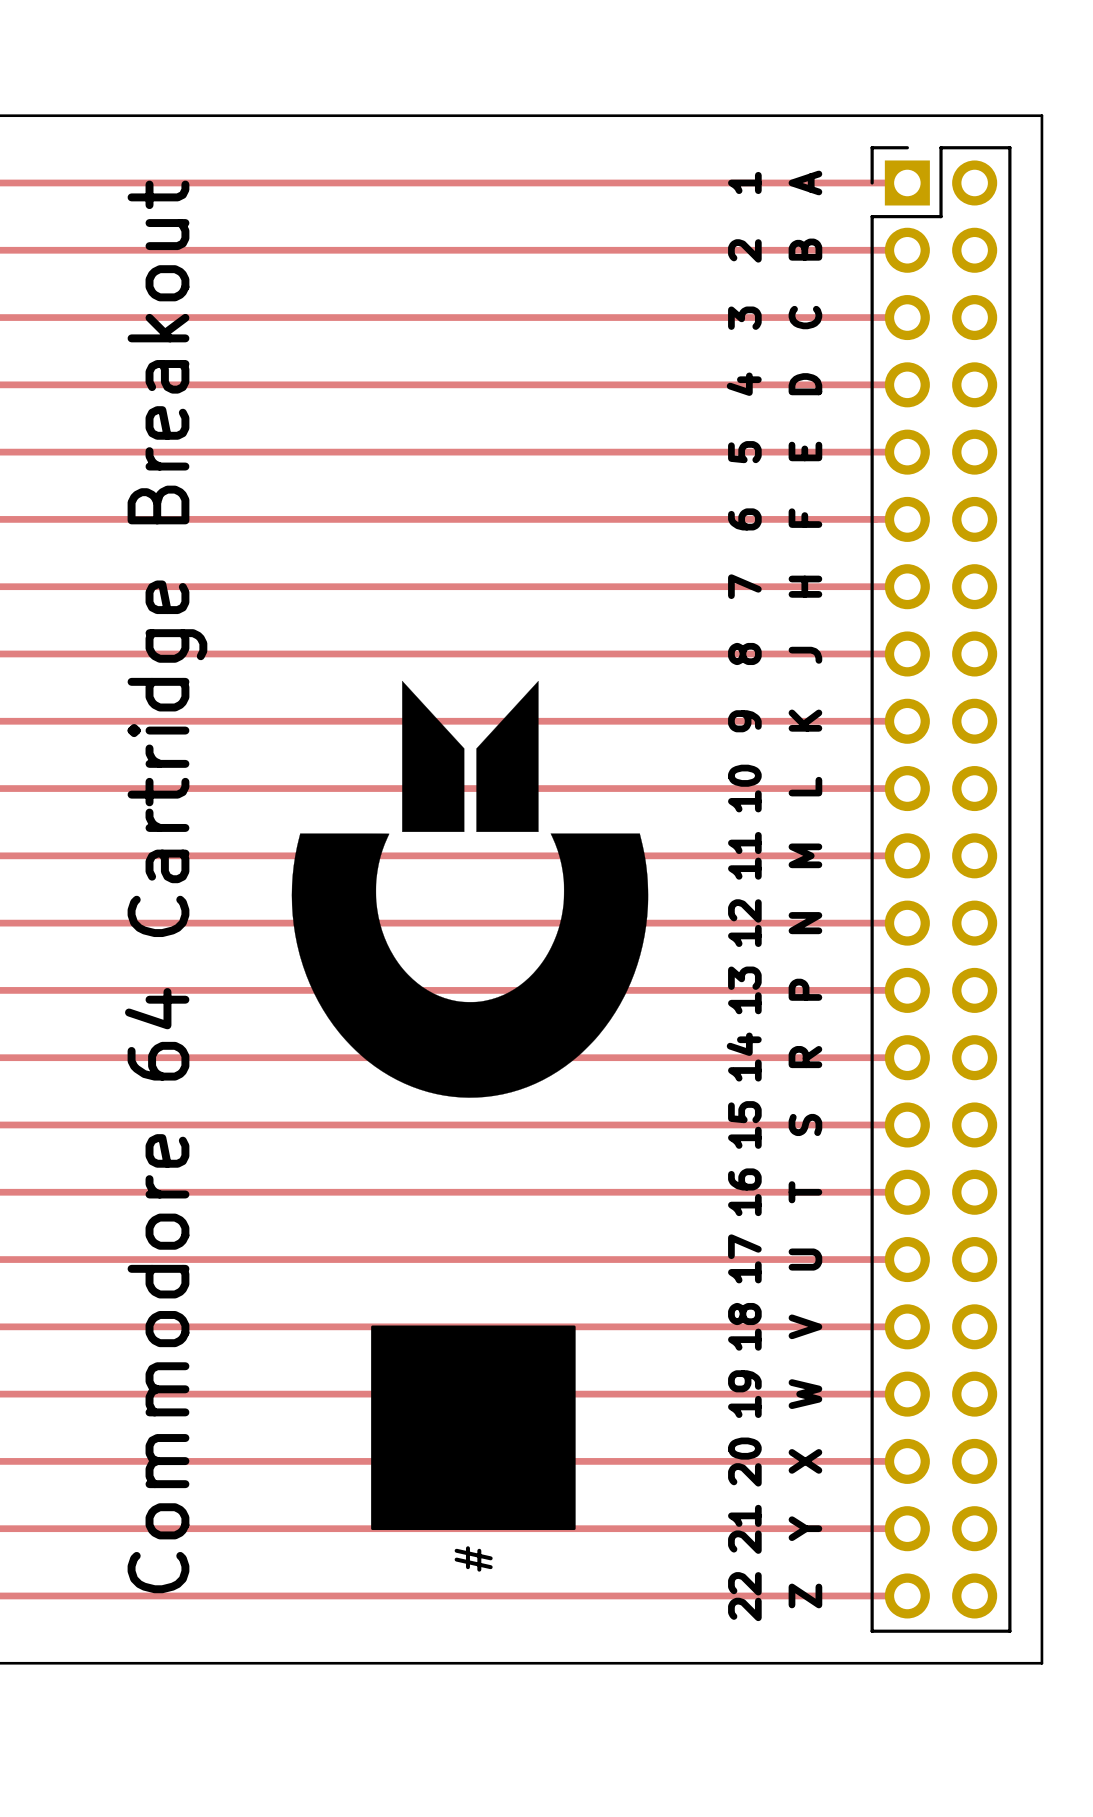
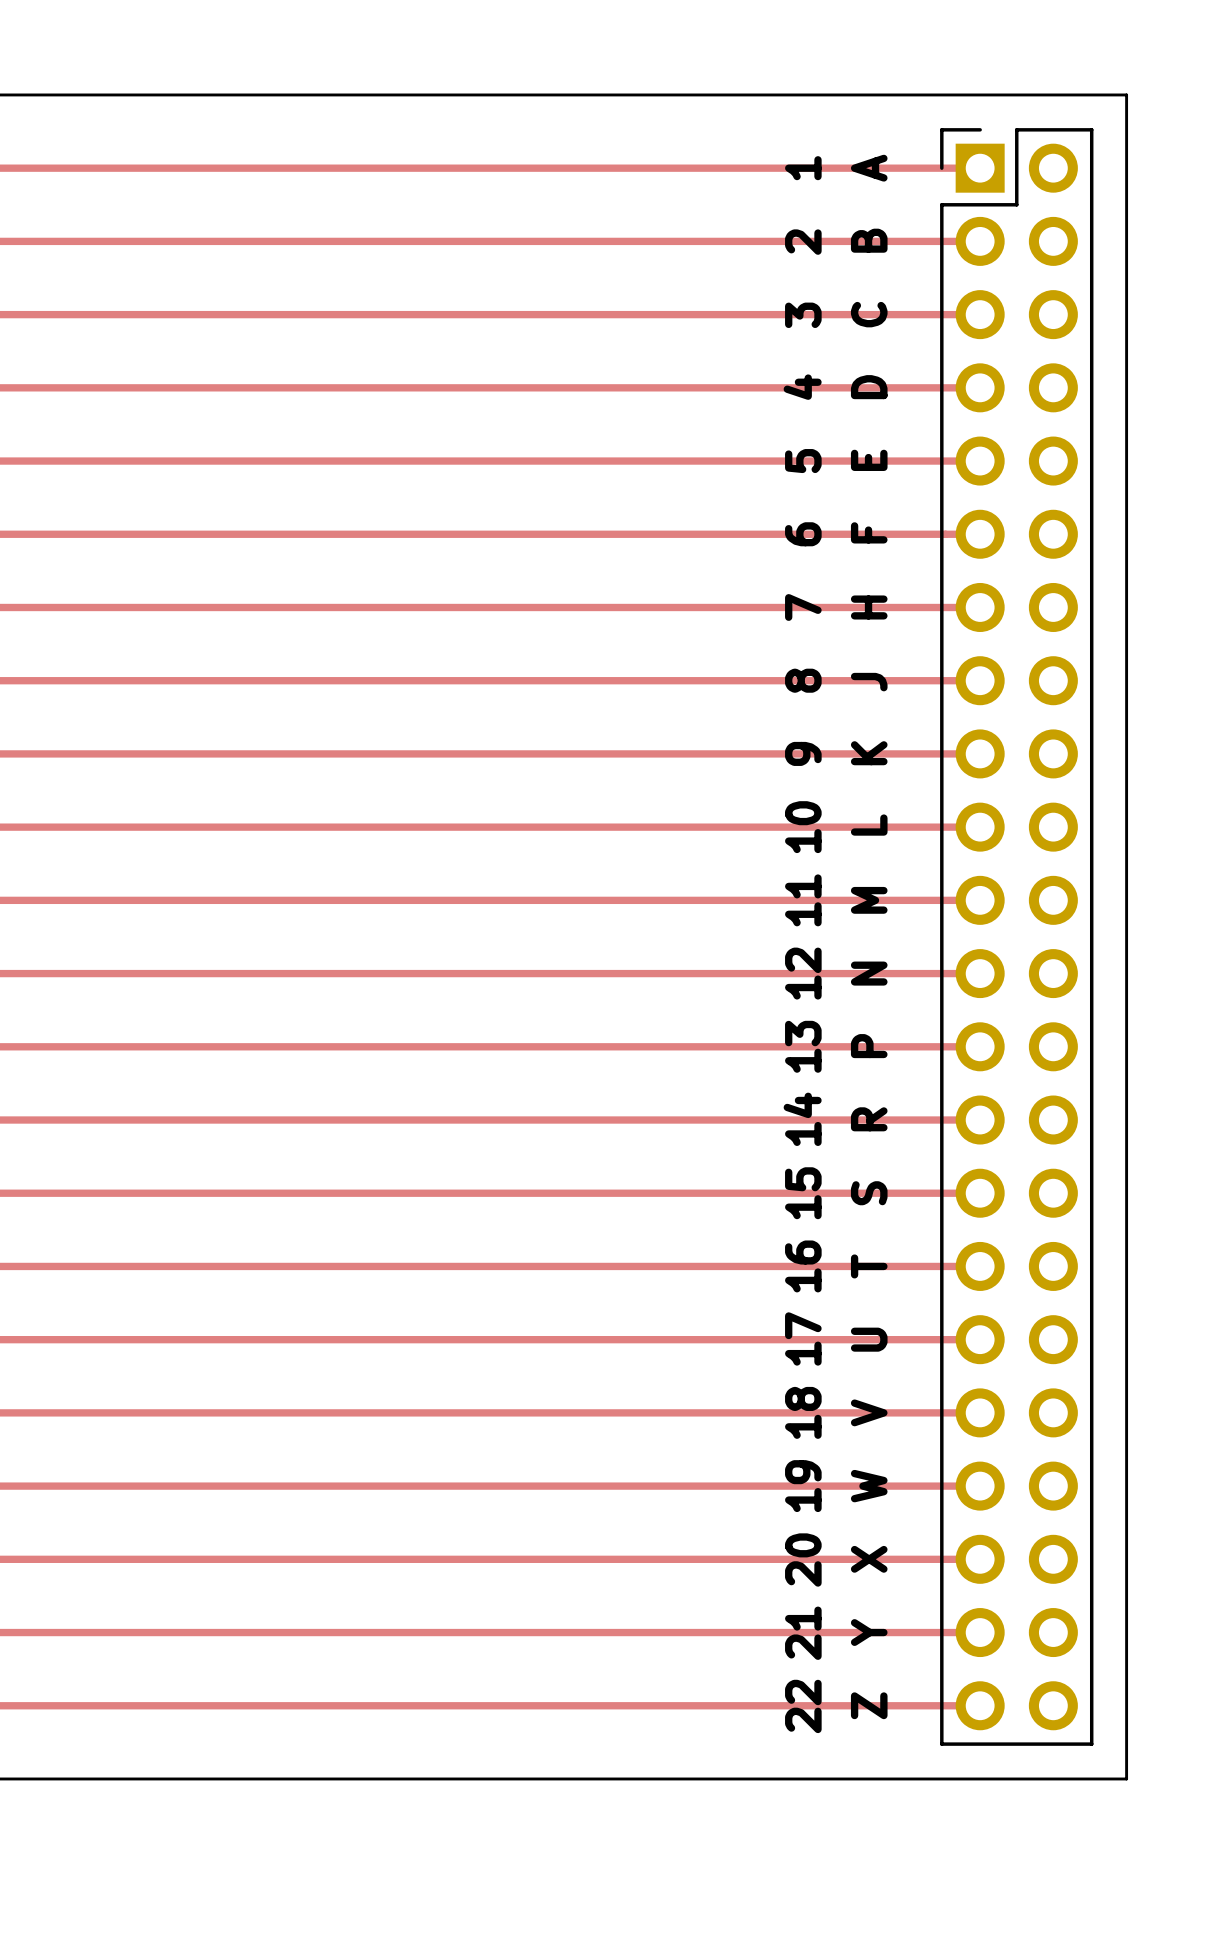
drawing: [291, 680, 649, 1098] -> none
text: Commodore 64 Cartridge Breakout (166, 886) -> none
drawing: [371, 1325, 576, 1531] -> none
text: # (473, 1558) -> none

